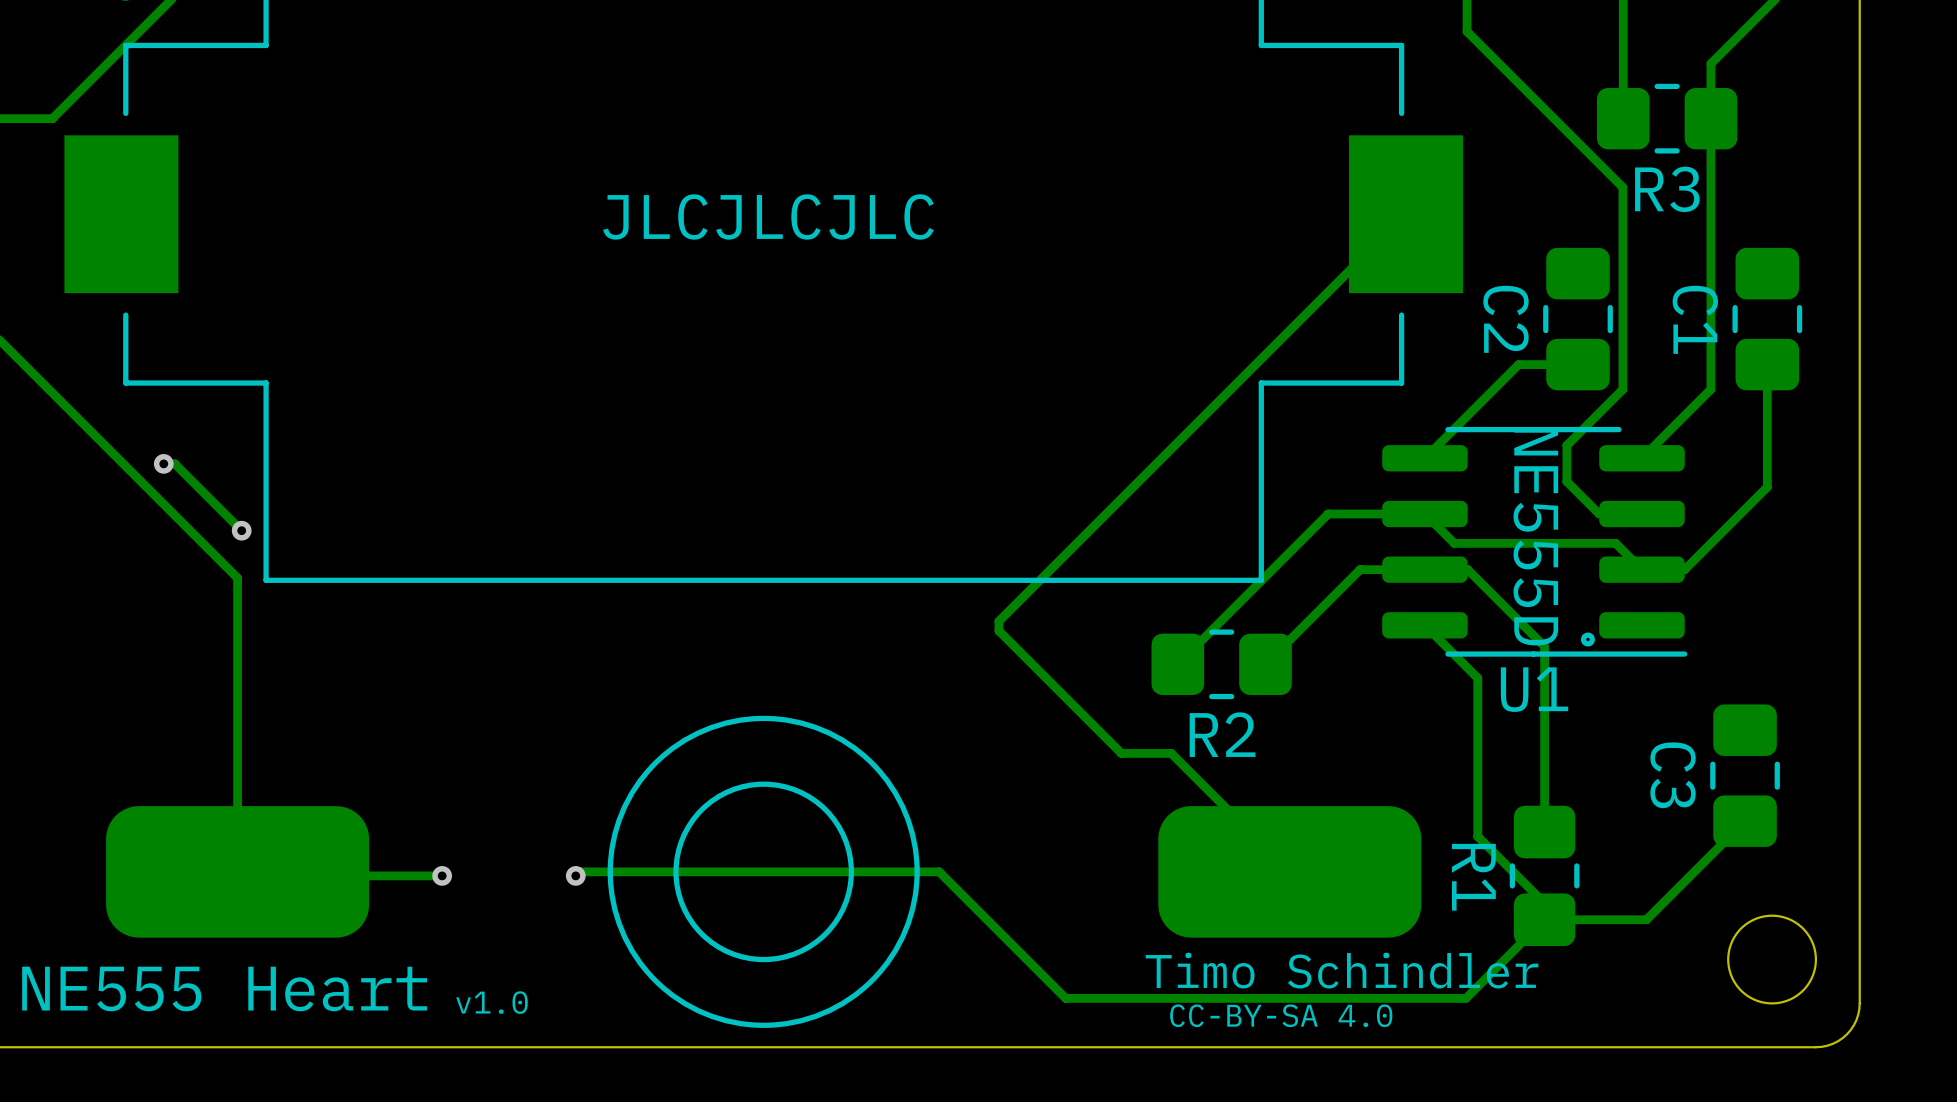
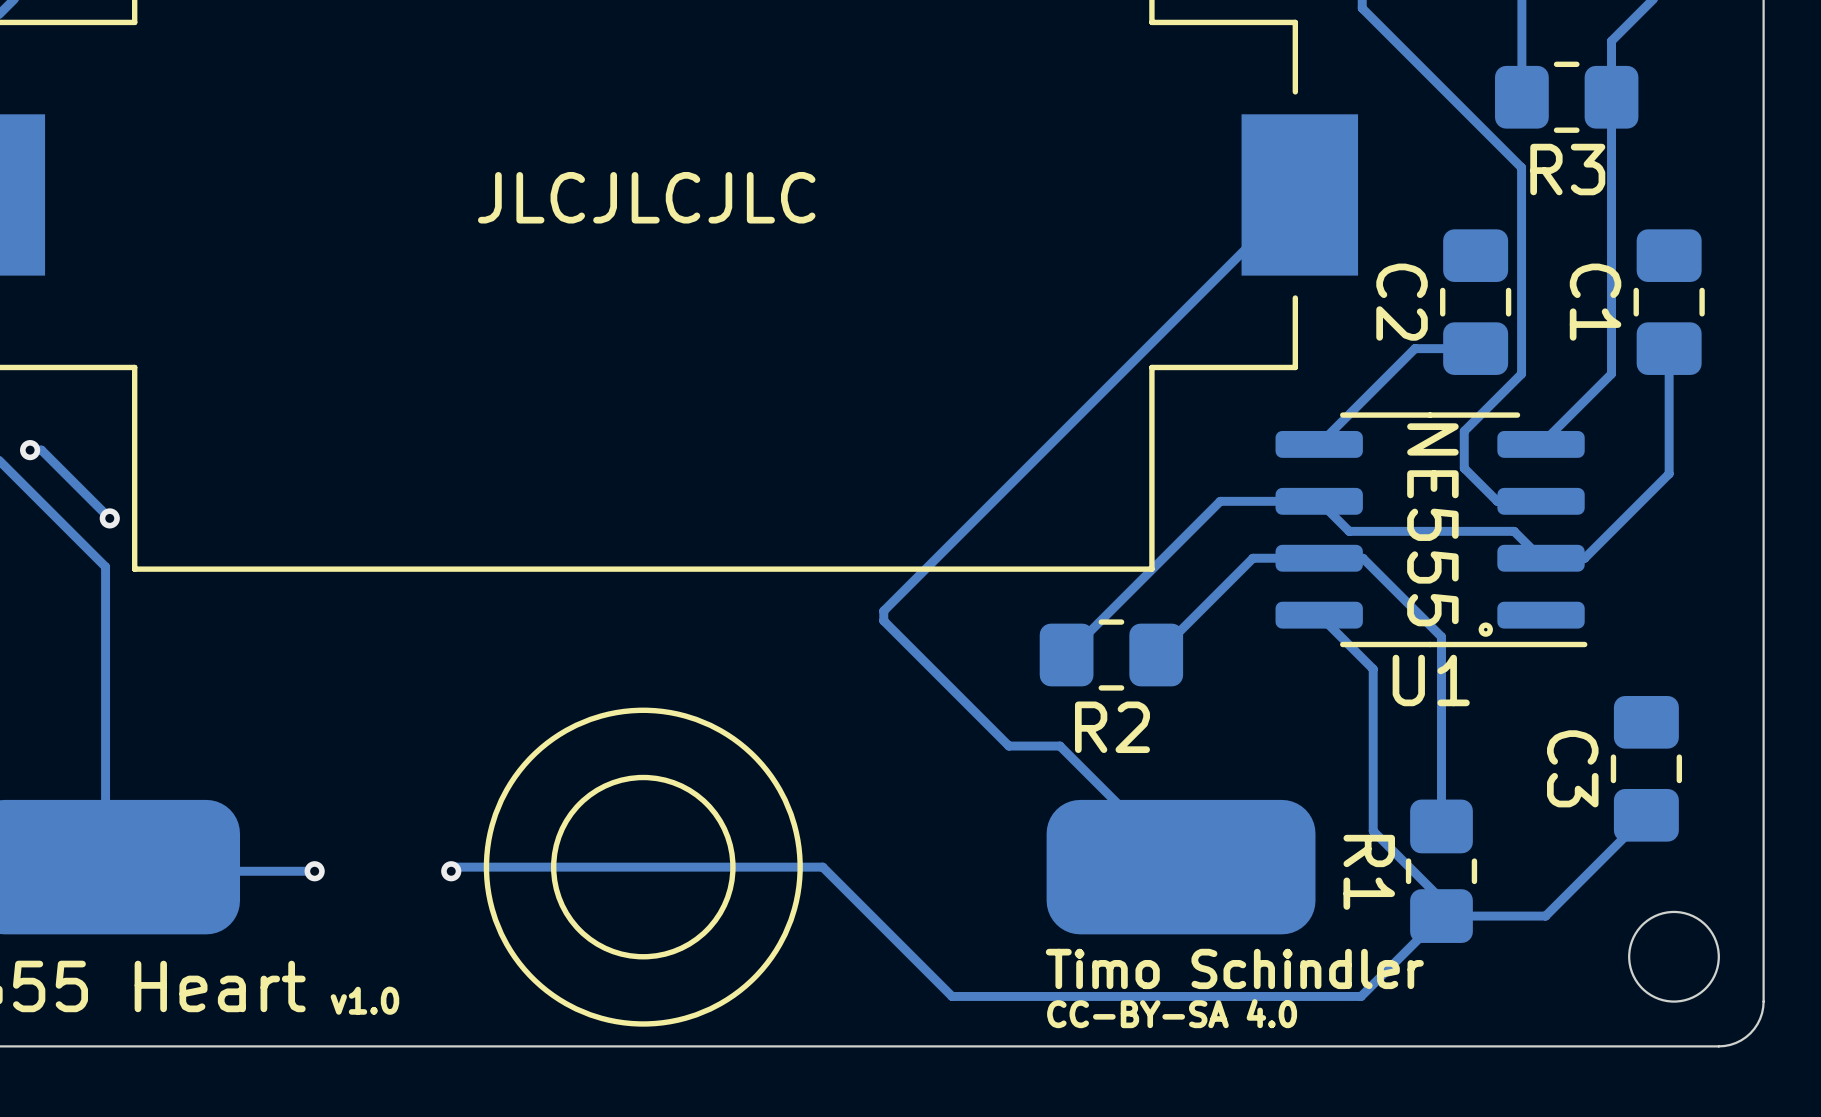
U1 value: NE555D (1535, 536) -> NE555 (1432, 524)

